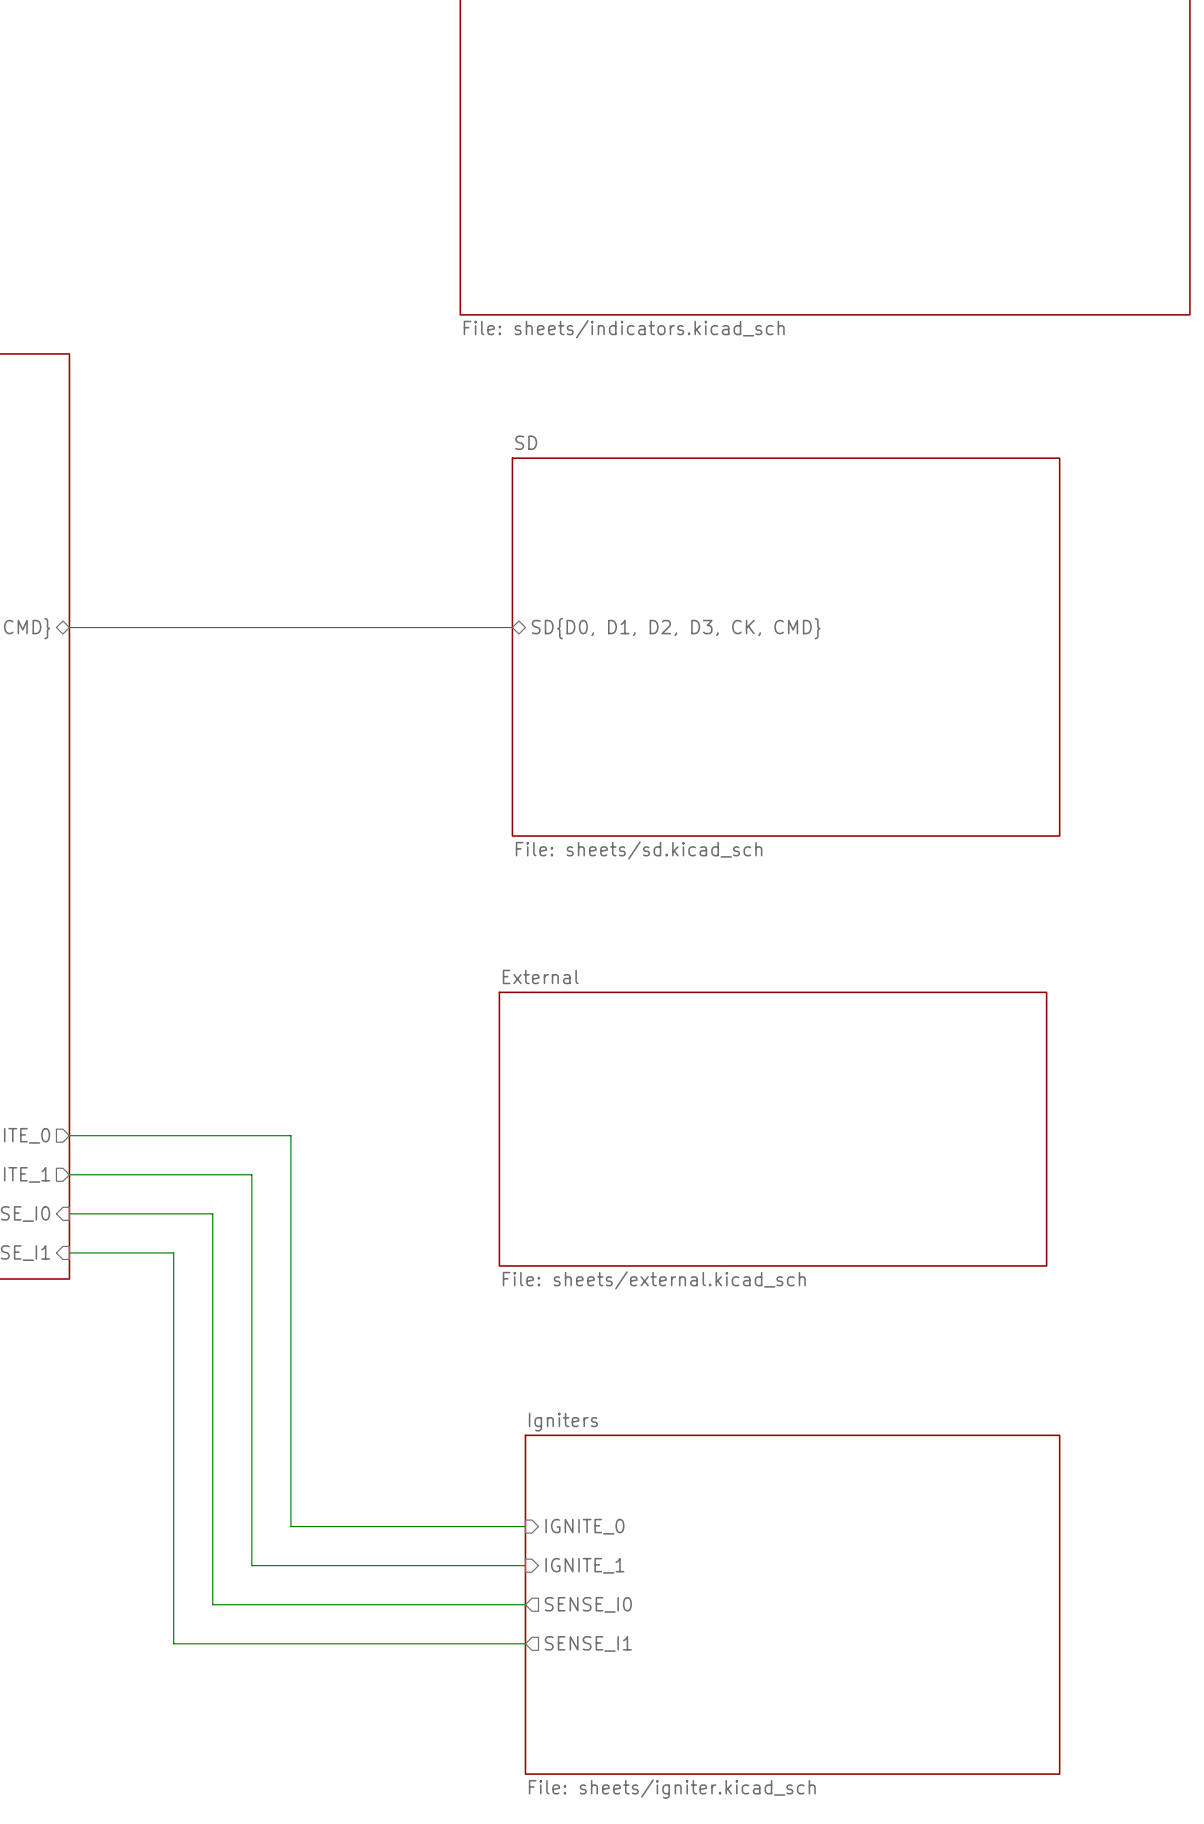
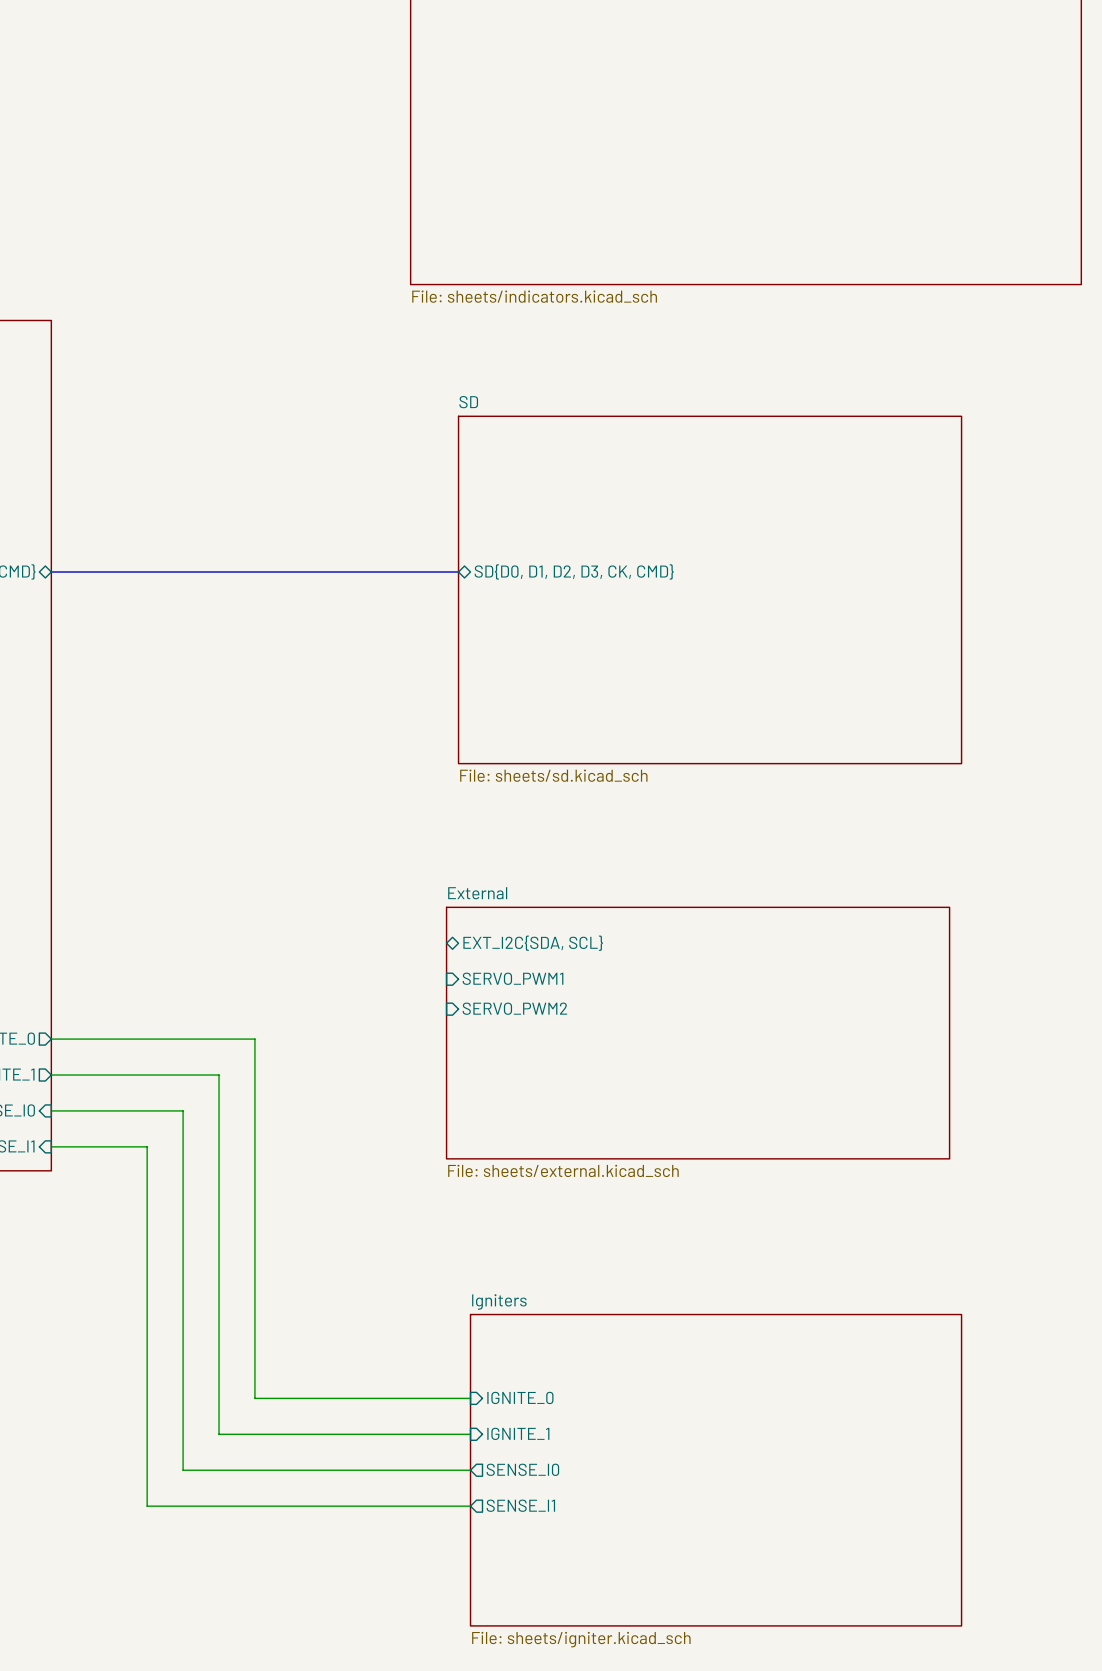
sheet pin: none -> EXT_I2C{SDA, SCL} (533, 943)
sheet pin: none -> SERVO_PWM1 (513, 978)
sheet pin: none -> SERVO_PWM2 (514, 1008)

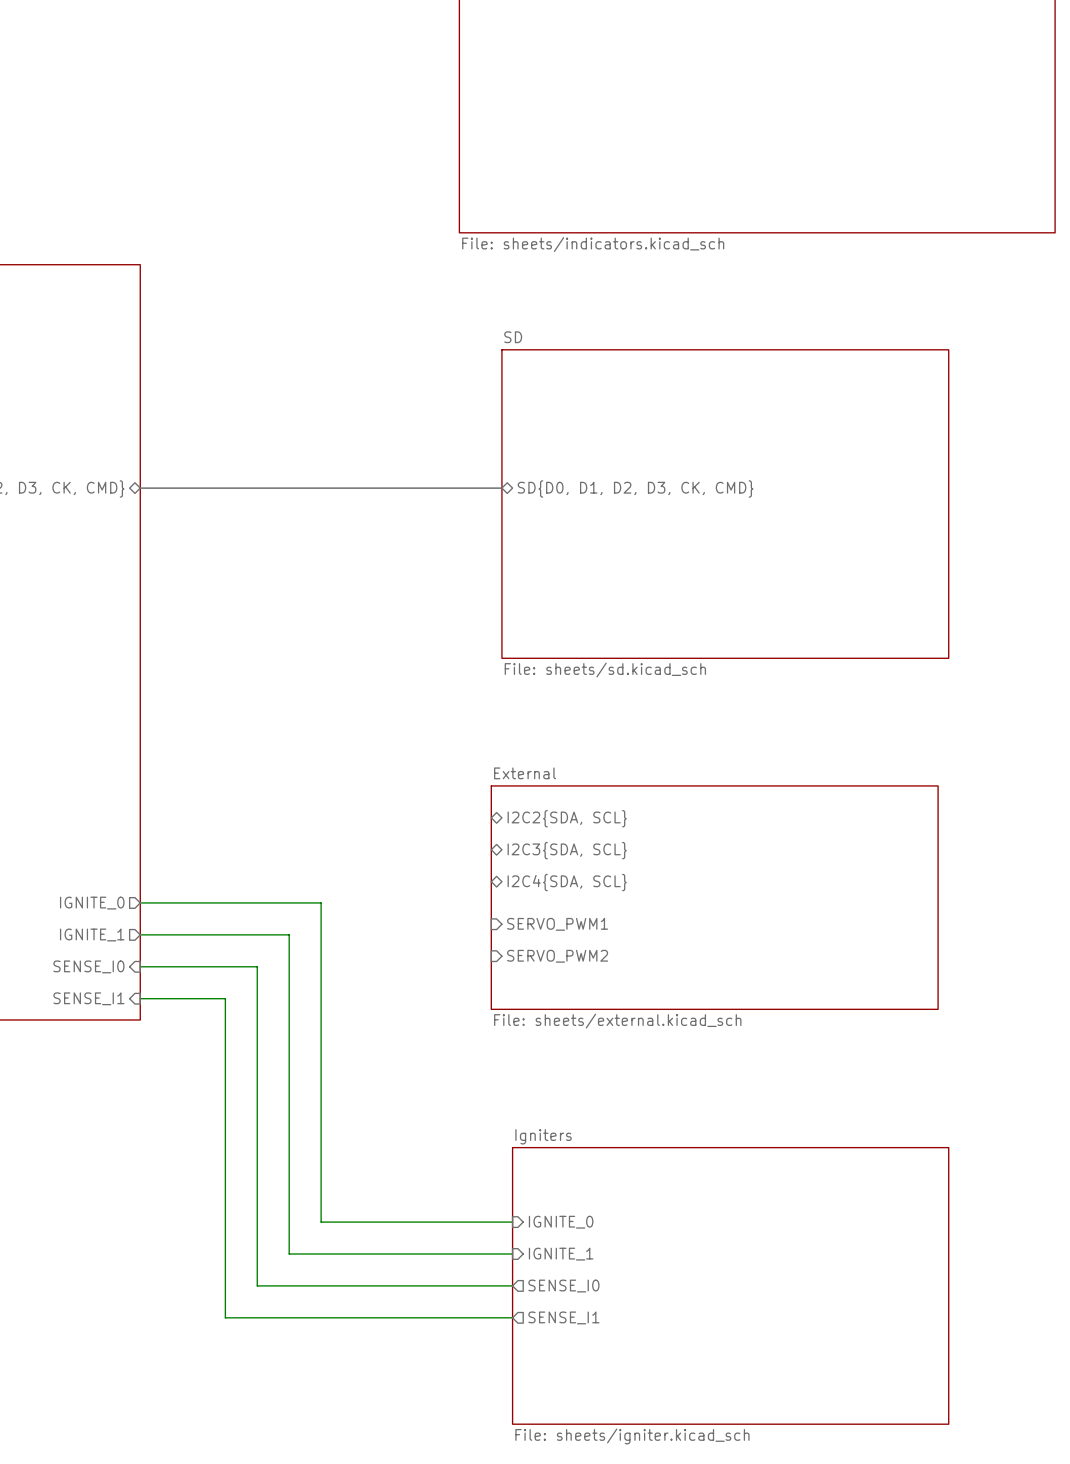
sheet pin: EXT_I2C{SDA, SCL} (533, 943) -> I2C2{SDA, SCL} (567, 818)
sheet pin shape: input (513, 978) -> bidirectional (567, 850)
sheet pin: SERVO_PWM1 (513, 978) -> I2C3{SDA, SCL} (567, 850)
sheet pin position: SERVO_PWM2 (514, 1008) -> SERVO_PWM2 (557, 956)
sheet pin: none -> I2C4{SDA, SCL} (567, 882)
sheet pin: none -> SERVO_PWM1 (557, 924)

